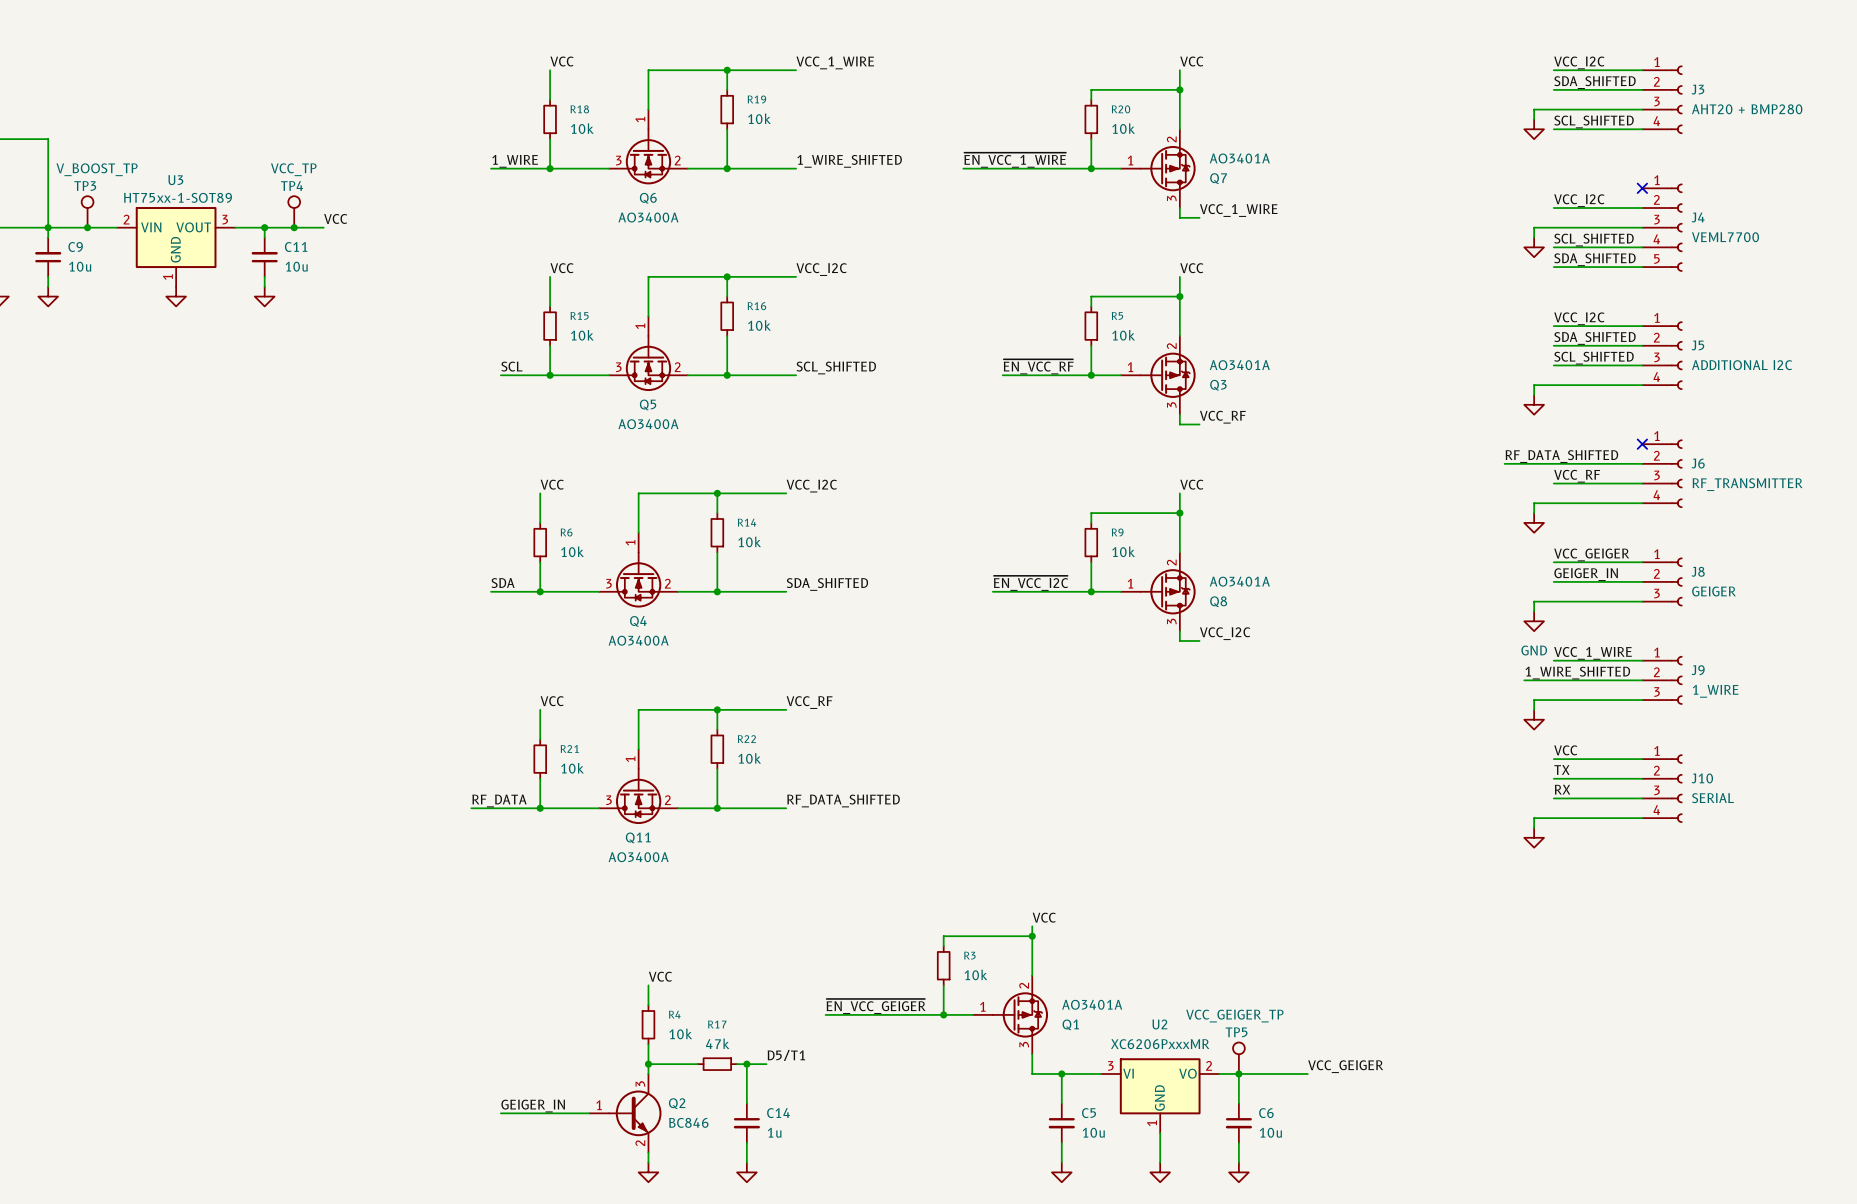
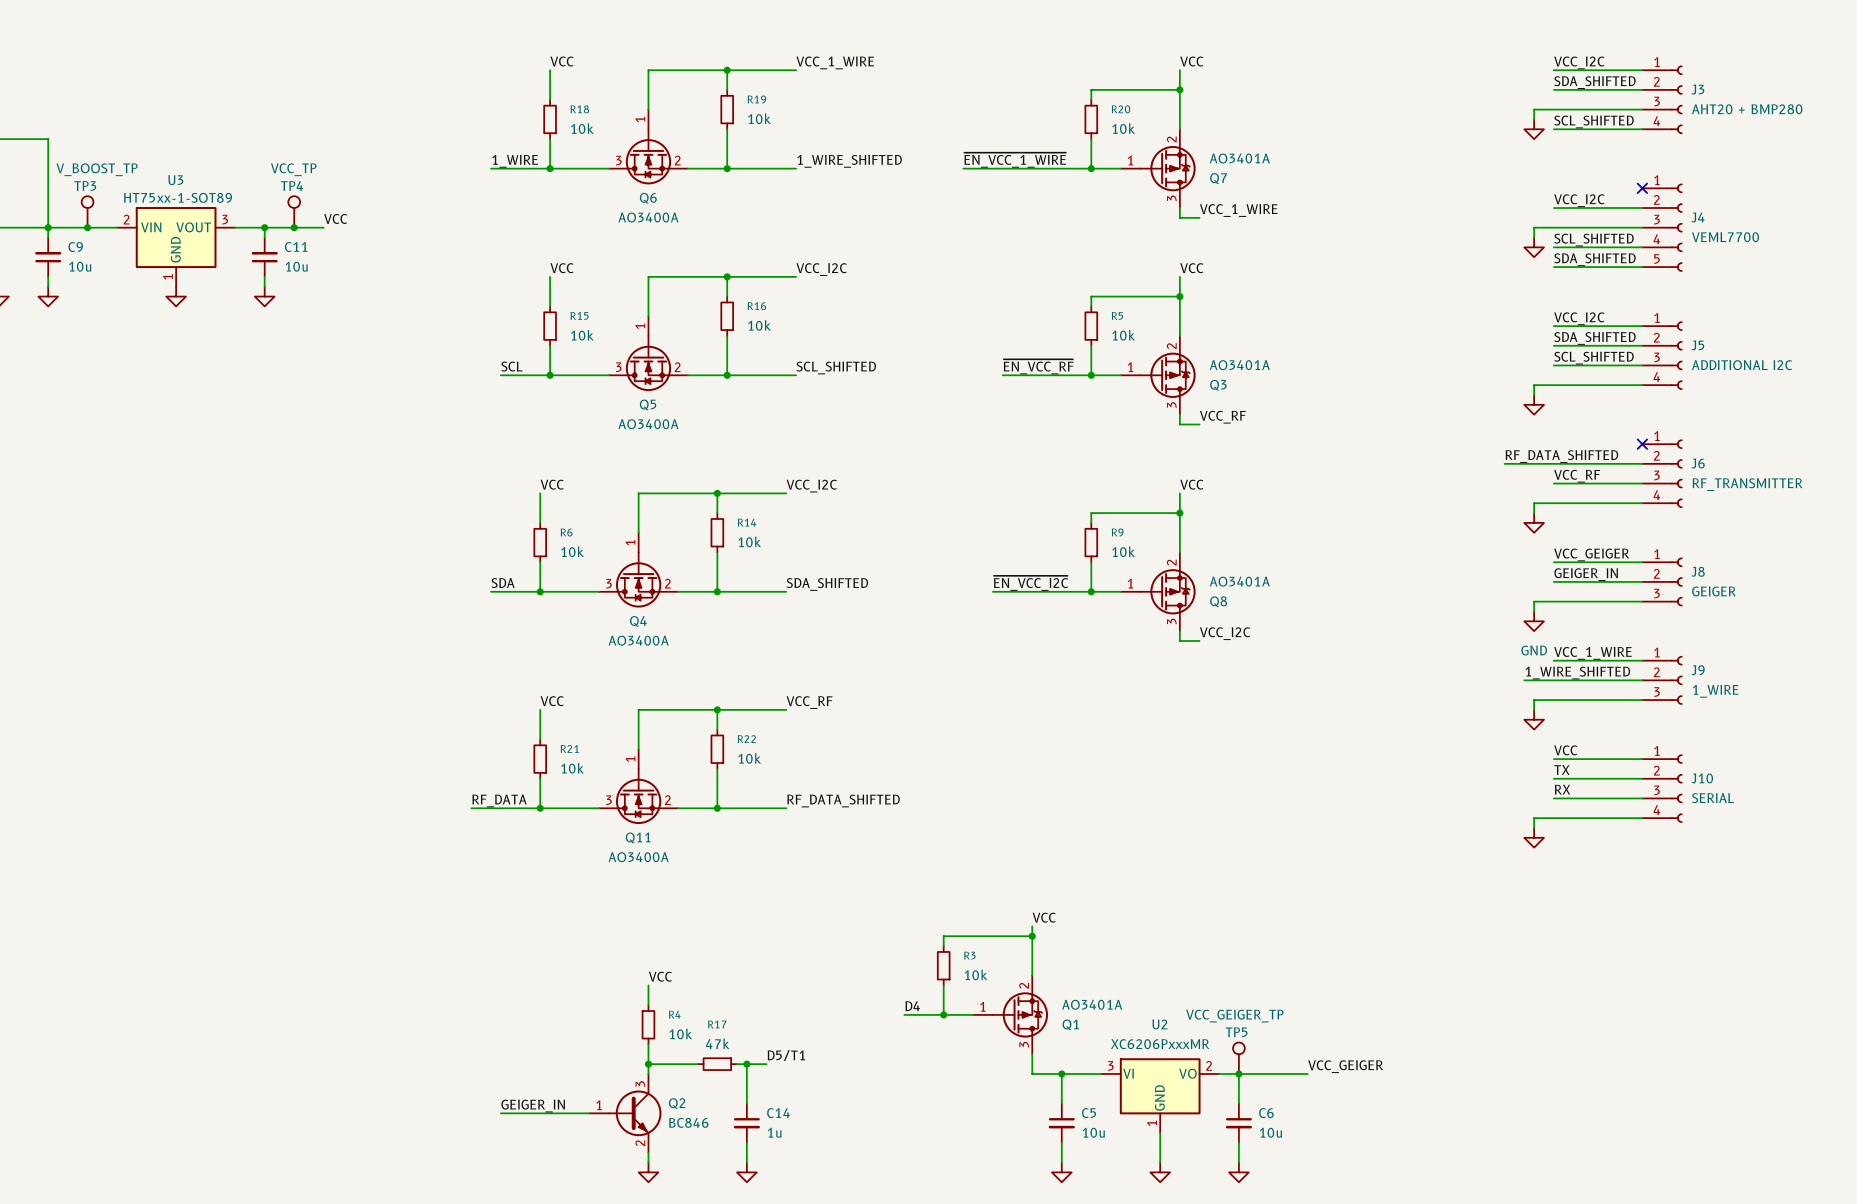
label: ~{EN_VCC_GEIGER} (876, 1006) -> none
label: none -> D4 (912, 1006)
wire: (825, 1014) (904, 1014) -> none

